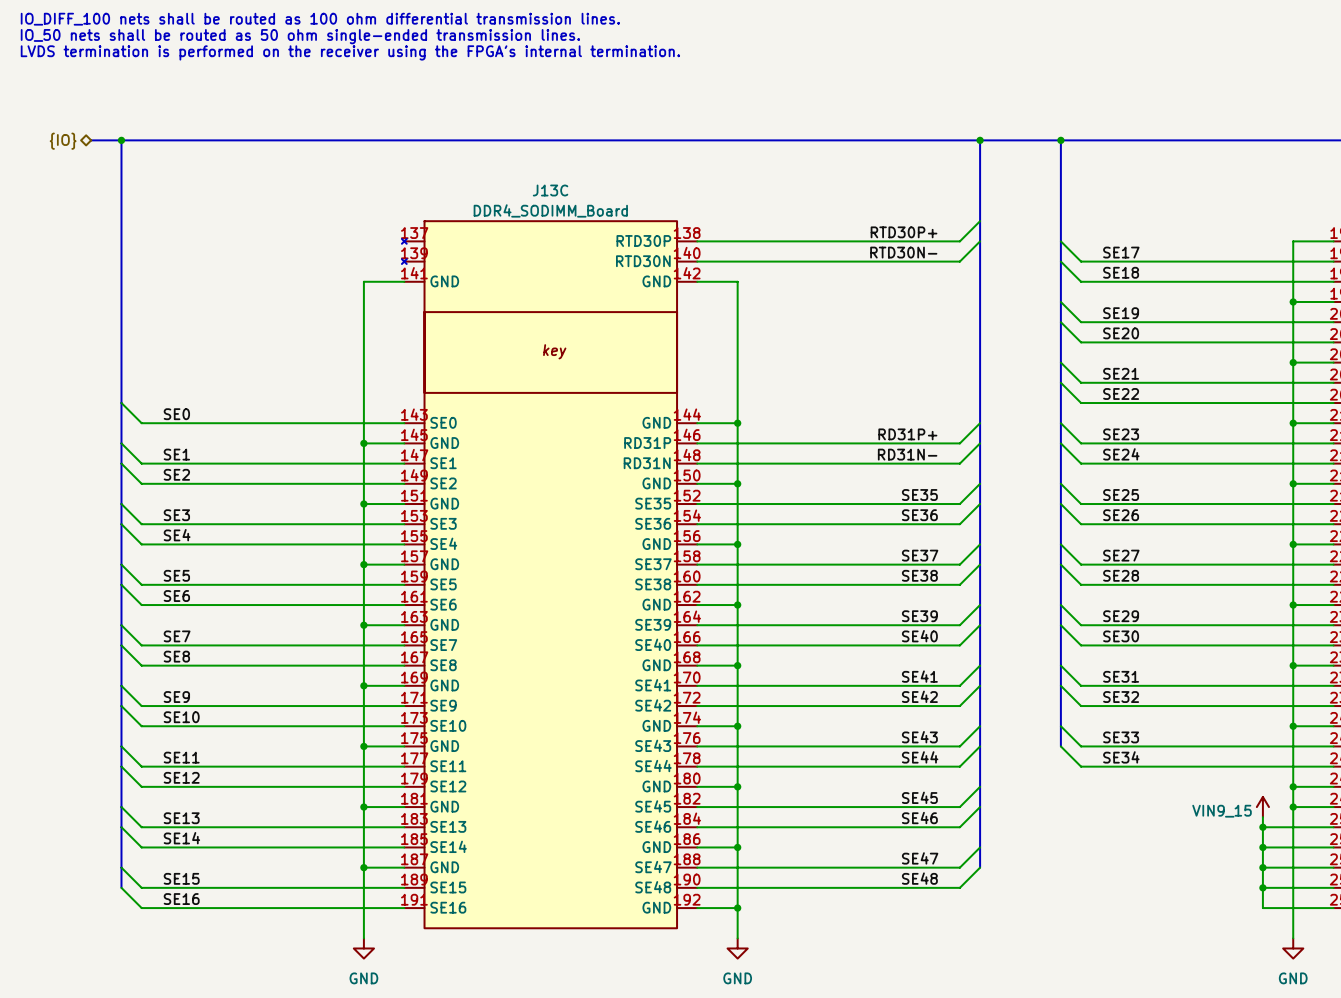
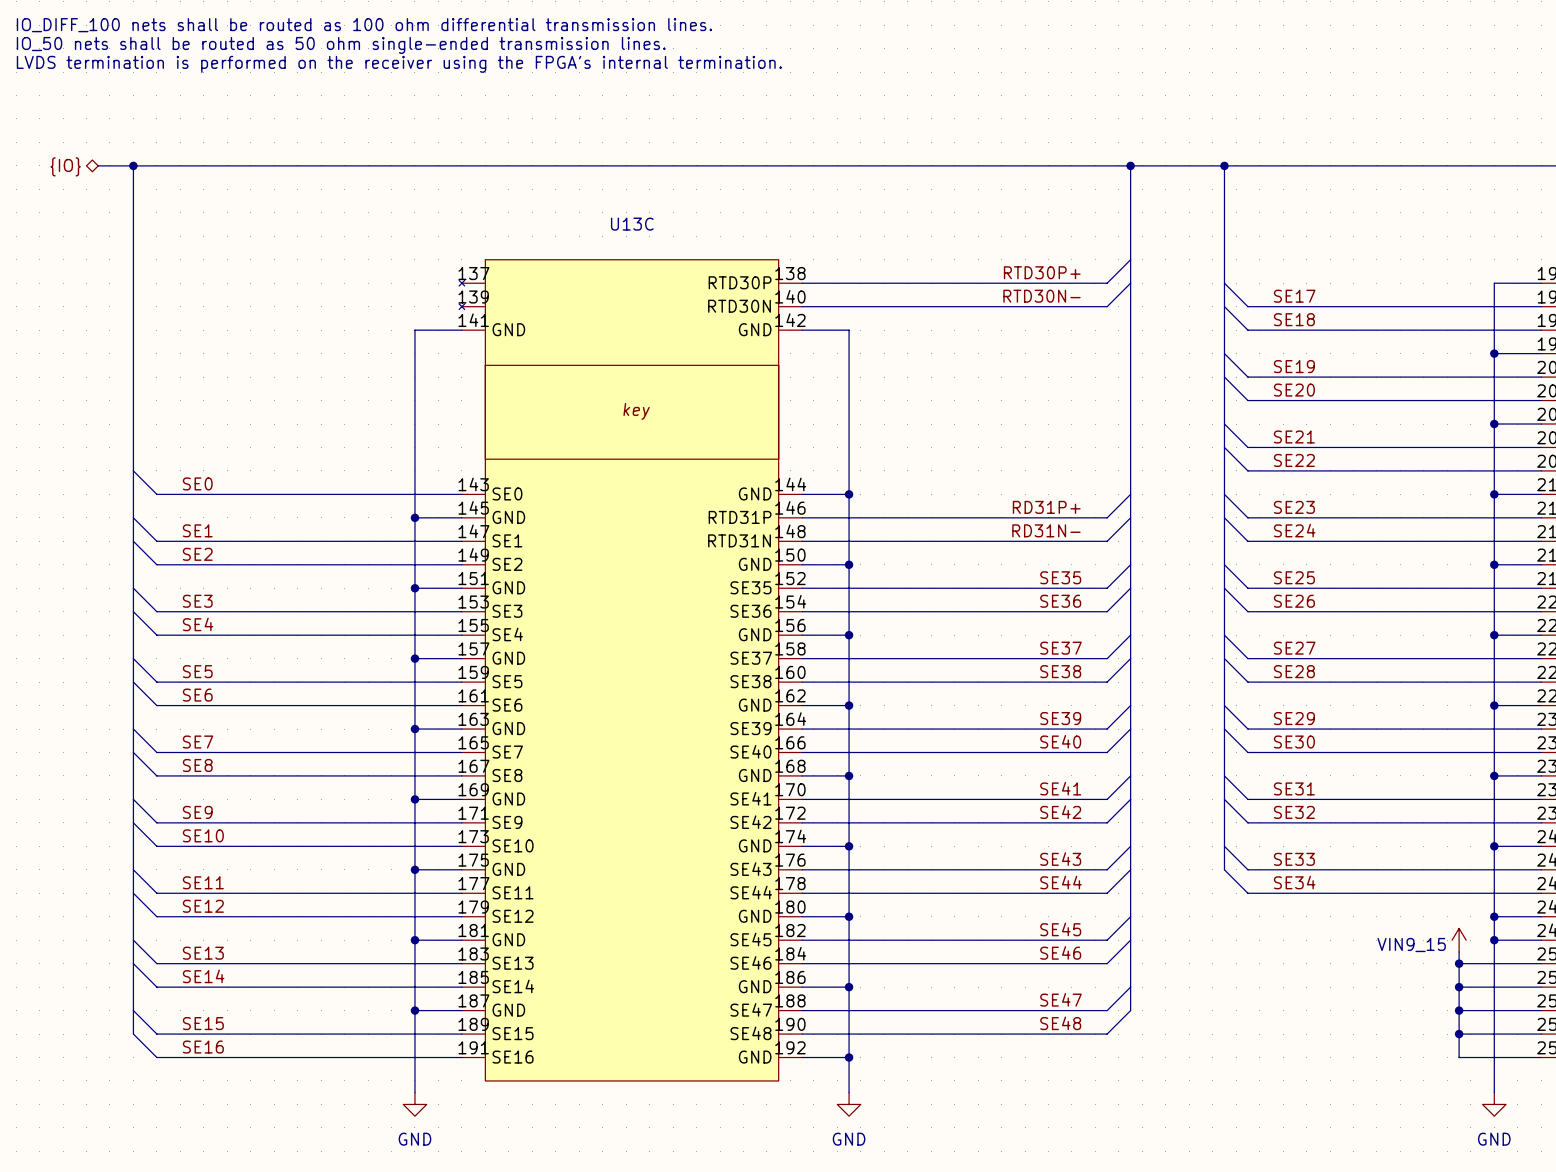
J13C name: J13C (550, 190) -> U13C (632, 224)
J13C value: DDR4_SODIMM_Board (550, 210) -> none
J13C pin name: RD31P (647, 443) -> RTD31P (740, 517)
J13C pin name: RD31N (647, 463) -> RTD31N (739, 540)

